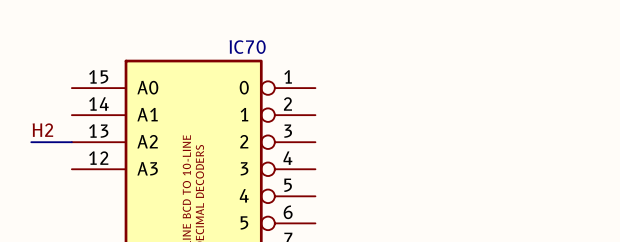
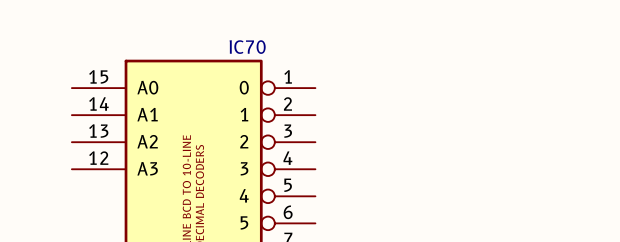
label: H2 (42, 130) -> none
wire: (31, 142) (71, 142) -> none

